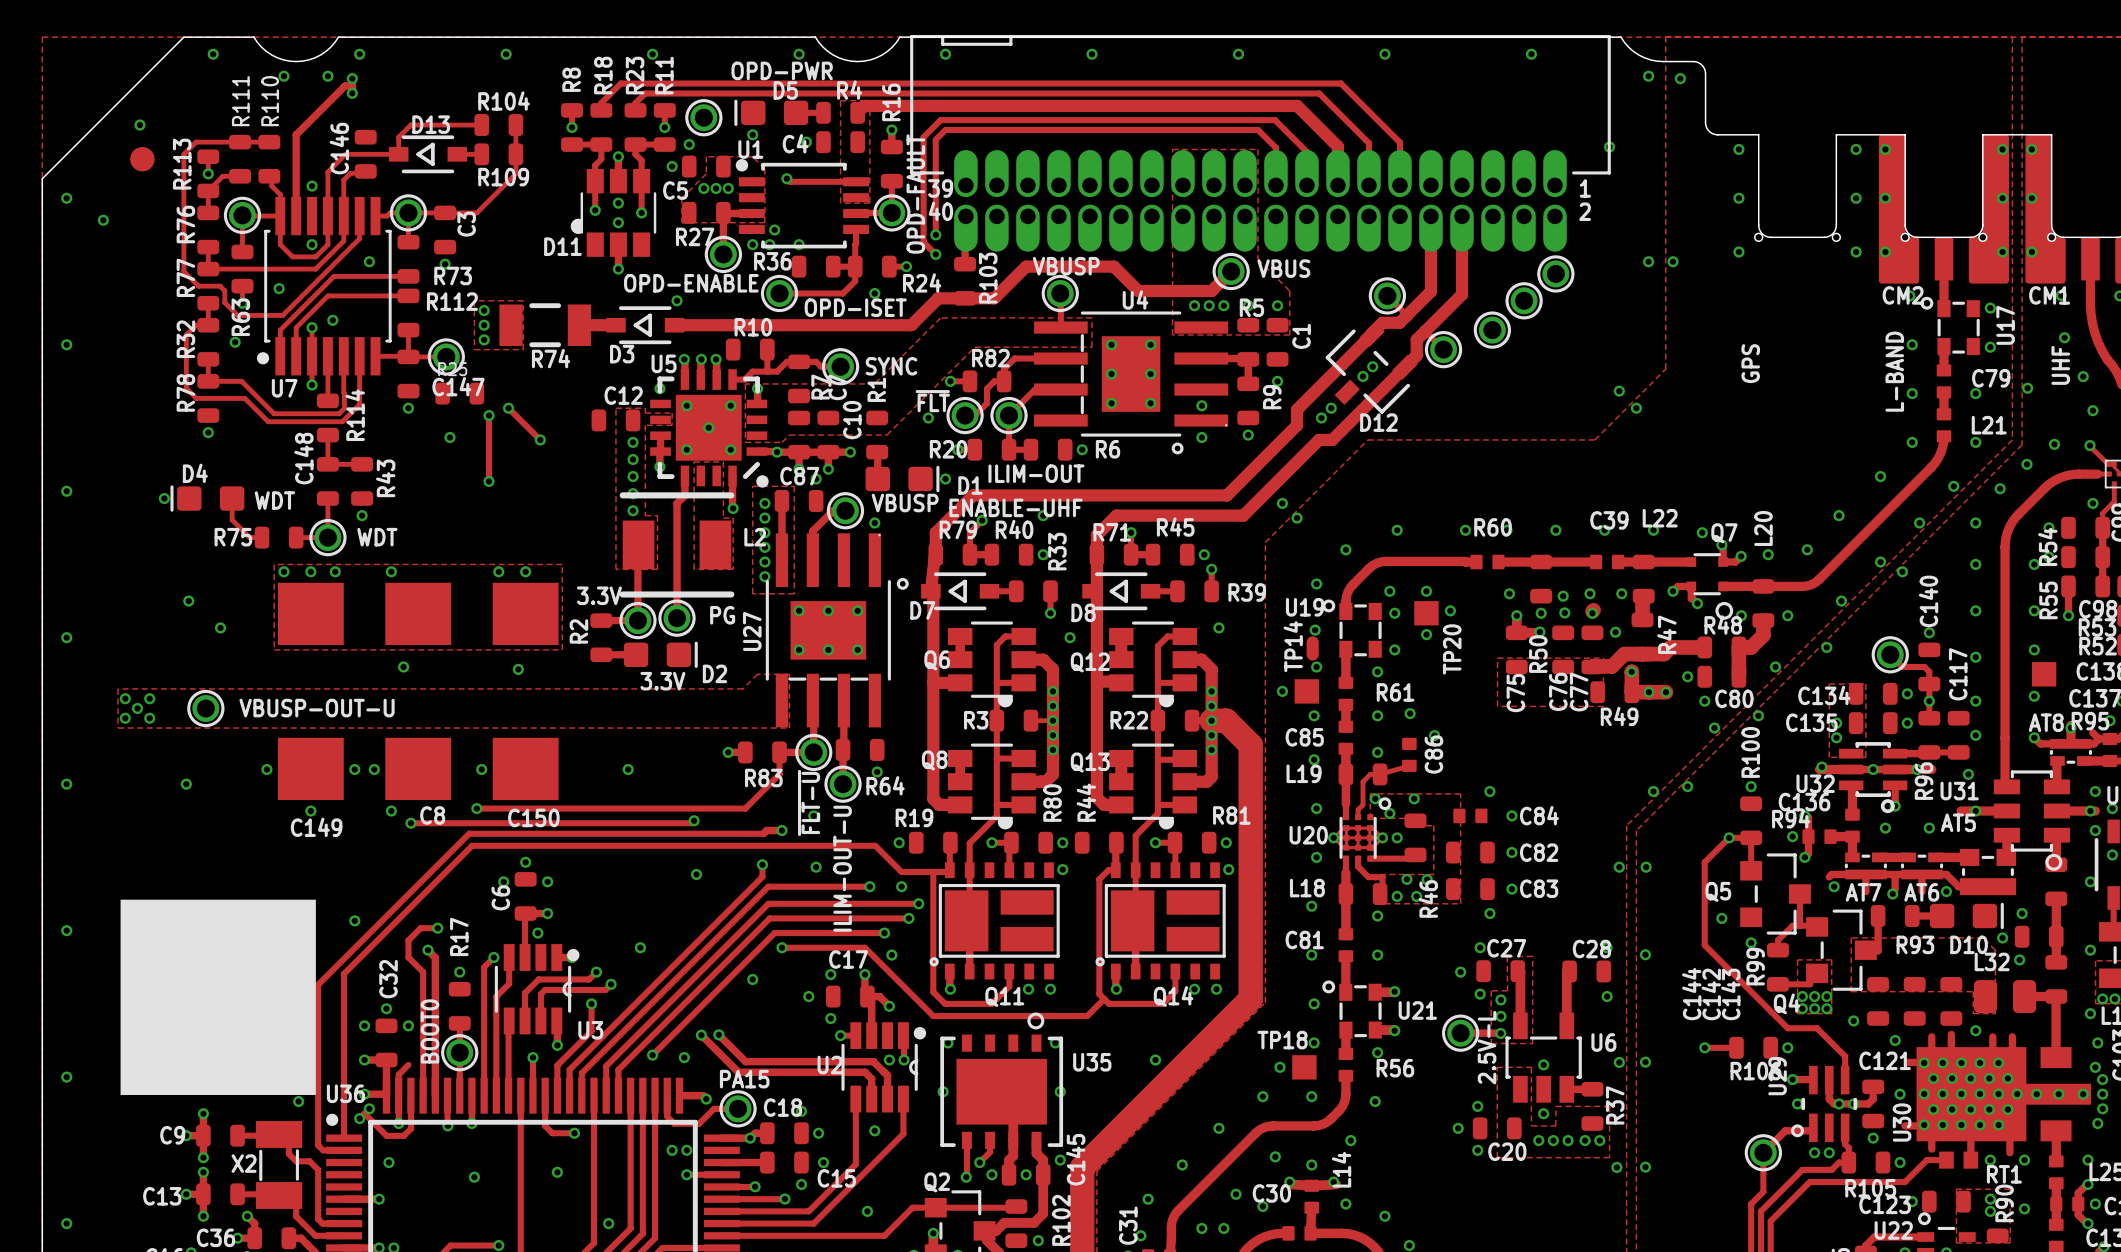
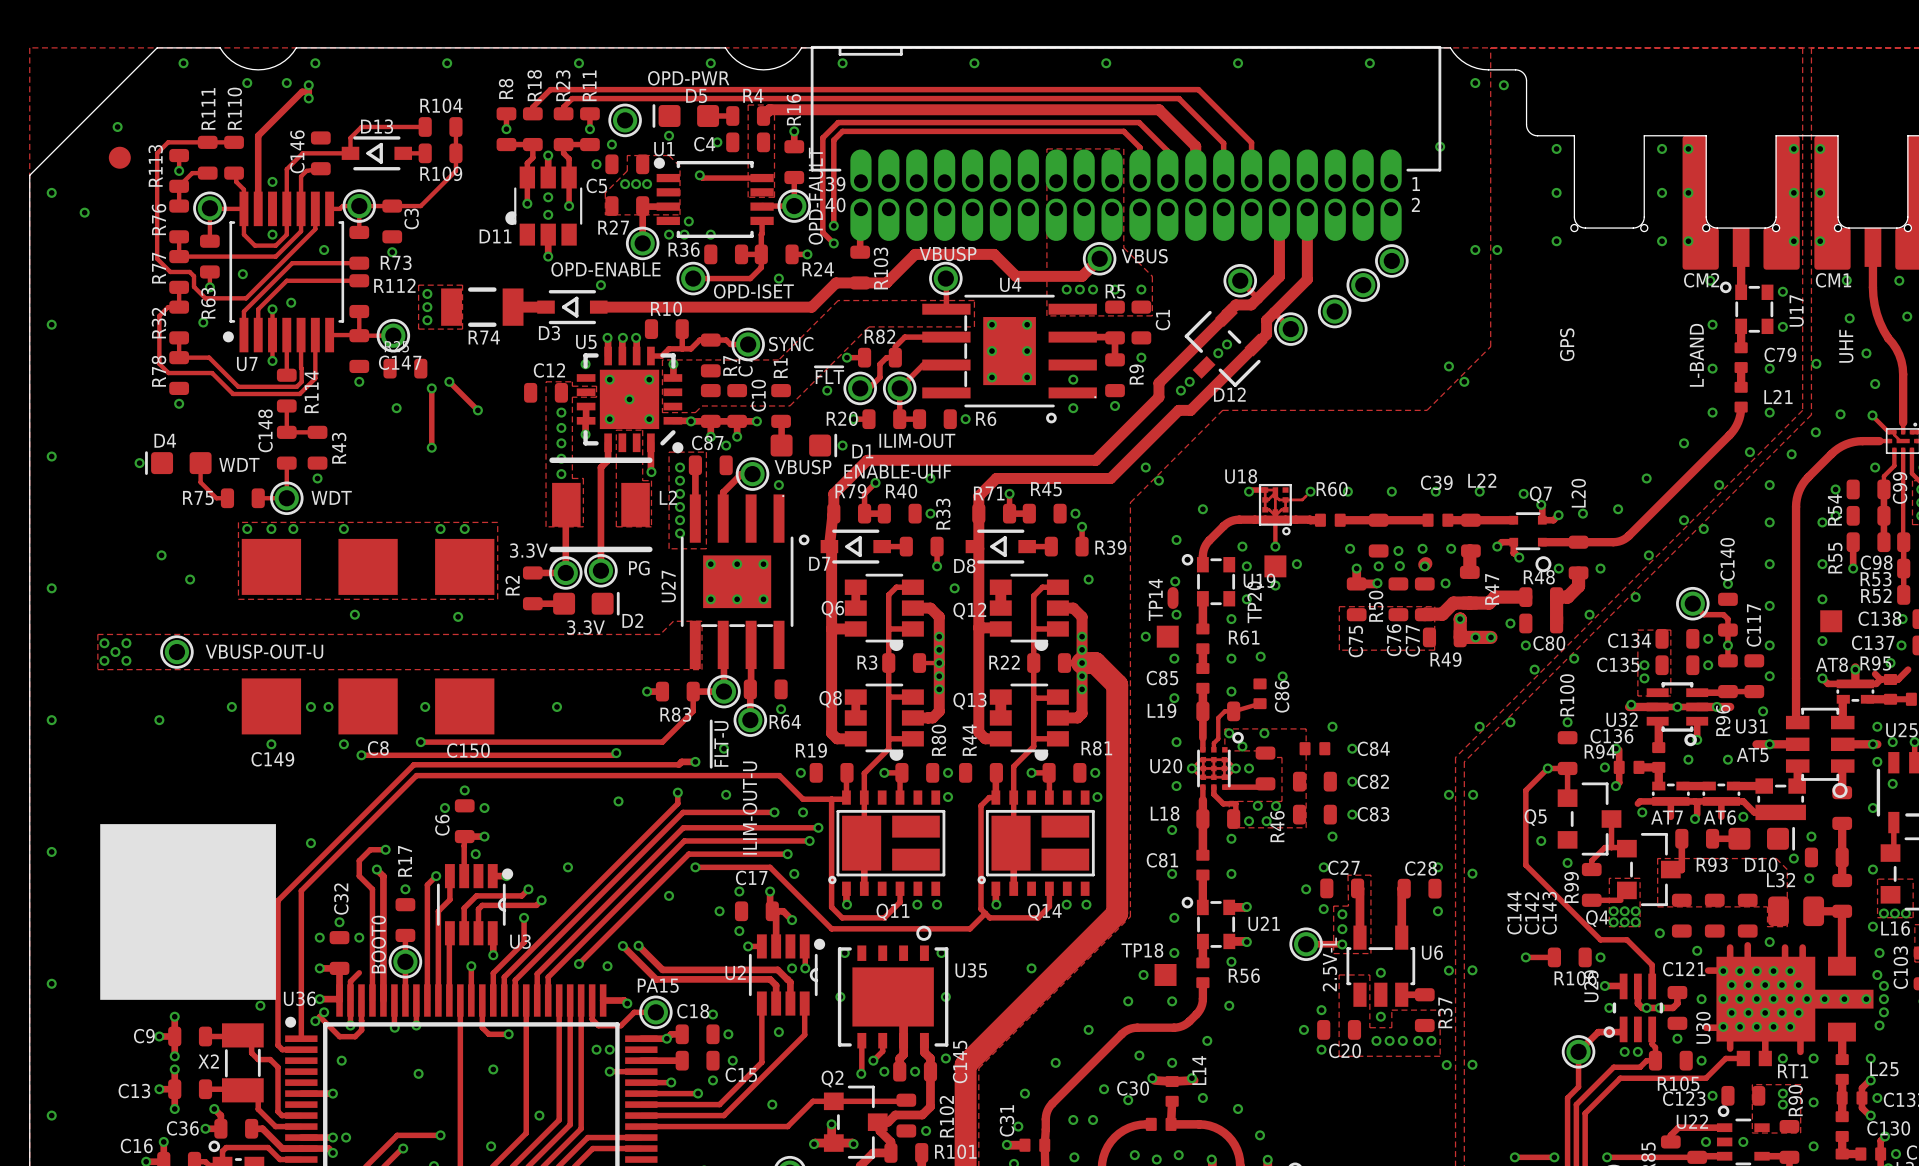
track: none -> (1250, 490) (1265, 490)
track: none -> (1265, 490) (1265, 509) (1269, 509) (1275, 515)
track: none -> (1265, 490) (1275, 490) (1275, 515)
track: none -> (1275, 492) (1268, 499) (1265, 499)
track: none -> (1275, 496) (1279, 499) (1302, 499) (1306, 496)
track: none -> (1285, 499) (1285, 509) (1281, 509) (1275, 515)
U18: none -> (1275, 509)
track: none -> (1275, 515) (1275, 542)
U19 name position: U19 (1305, 607) -> U19 (1259, 580)
TP20 name position: TP20 (1452, 649) -> TP20 (1254, 602)

